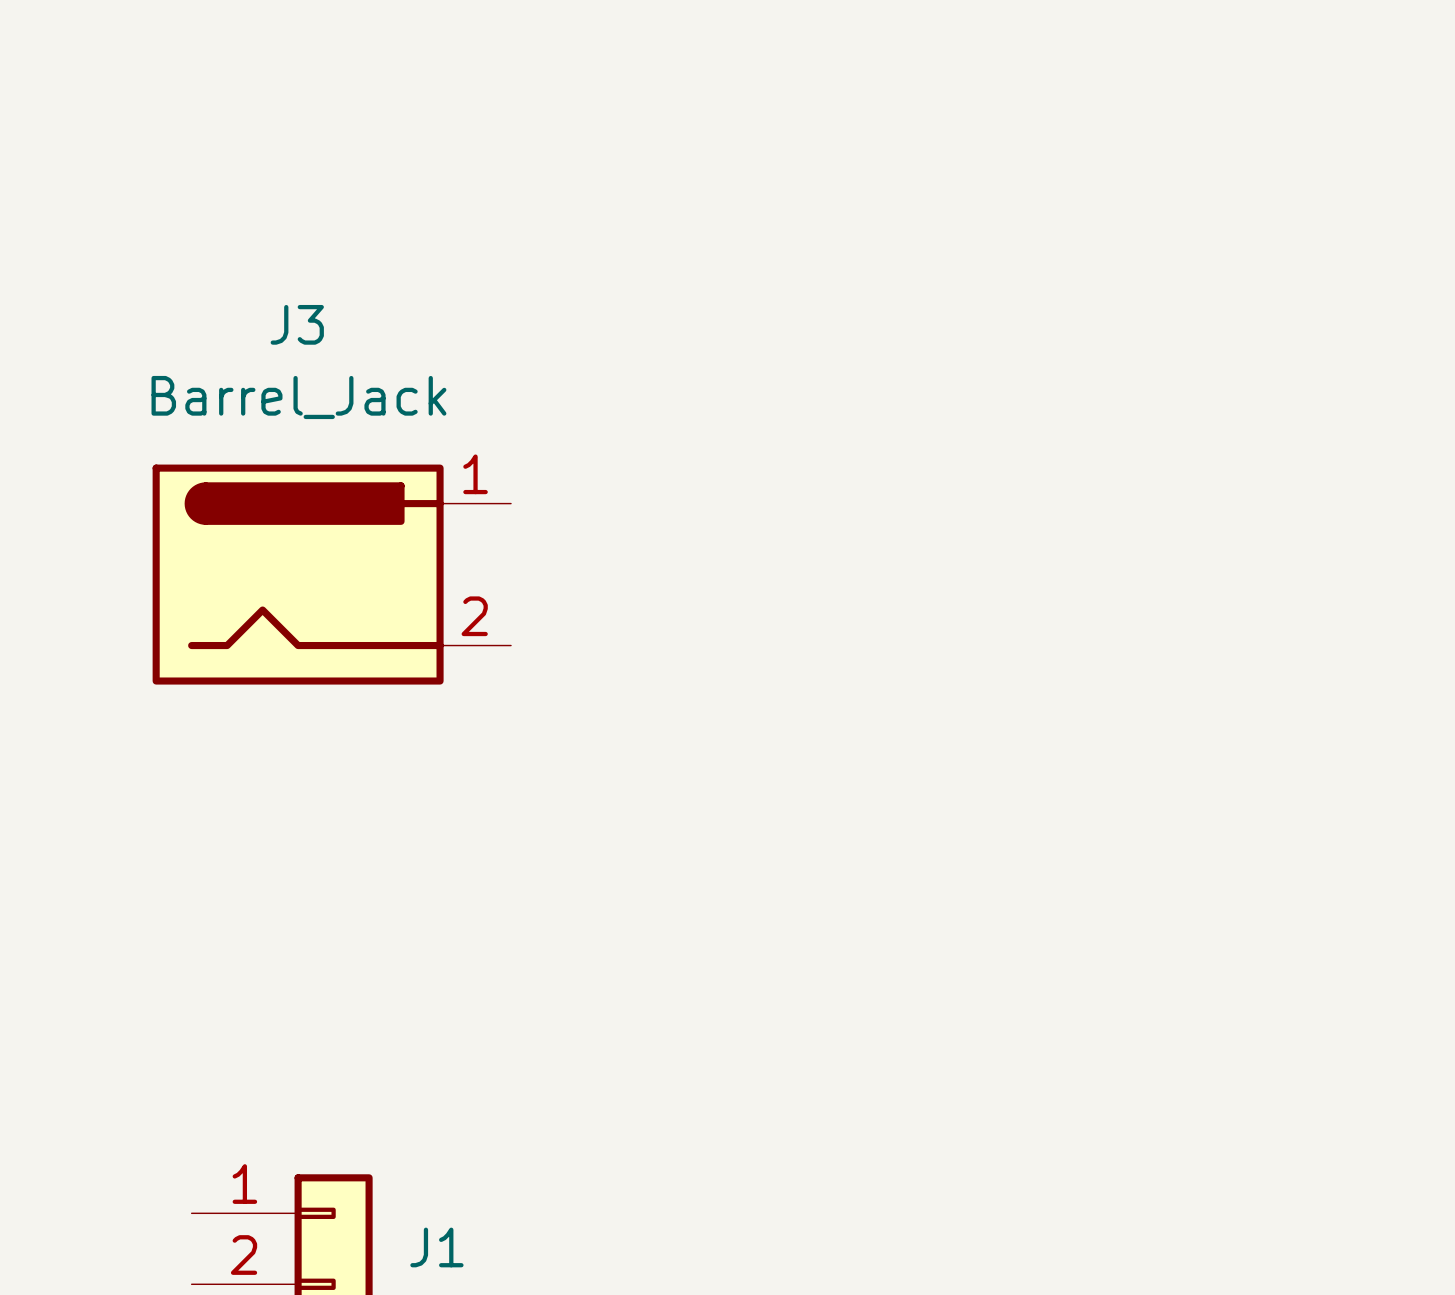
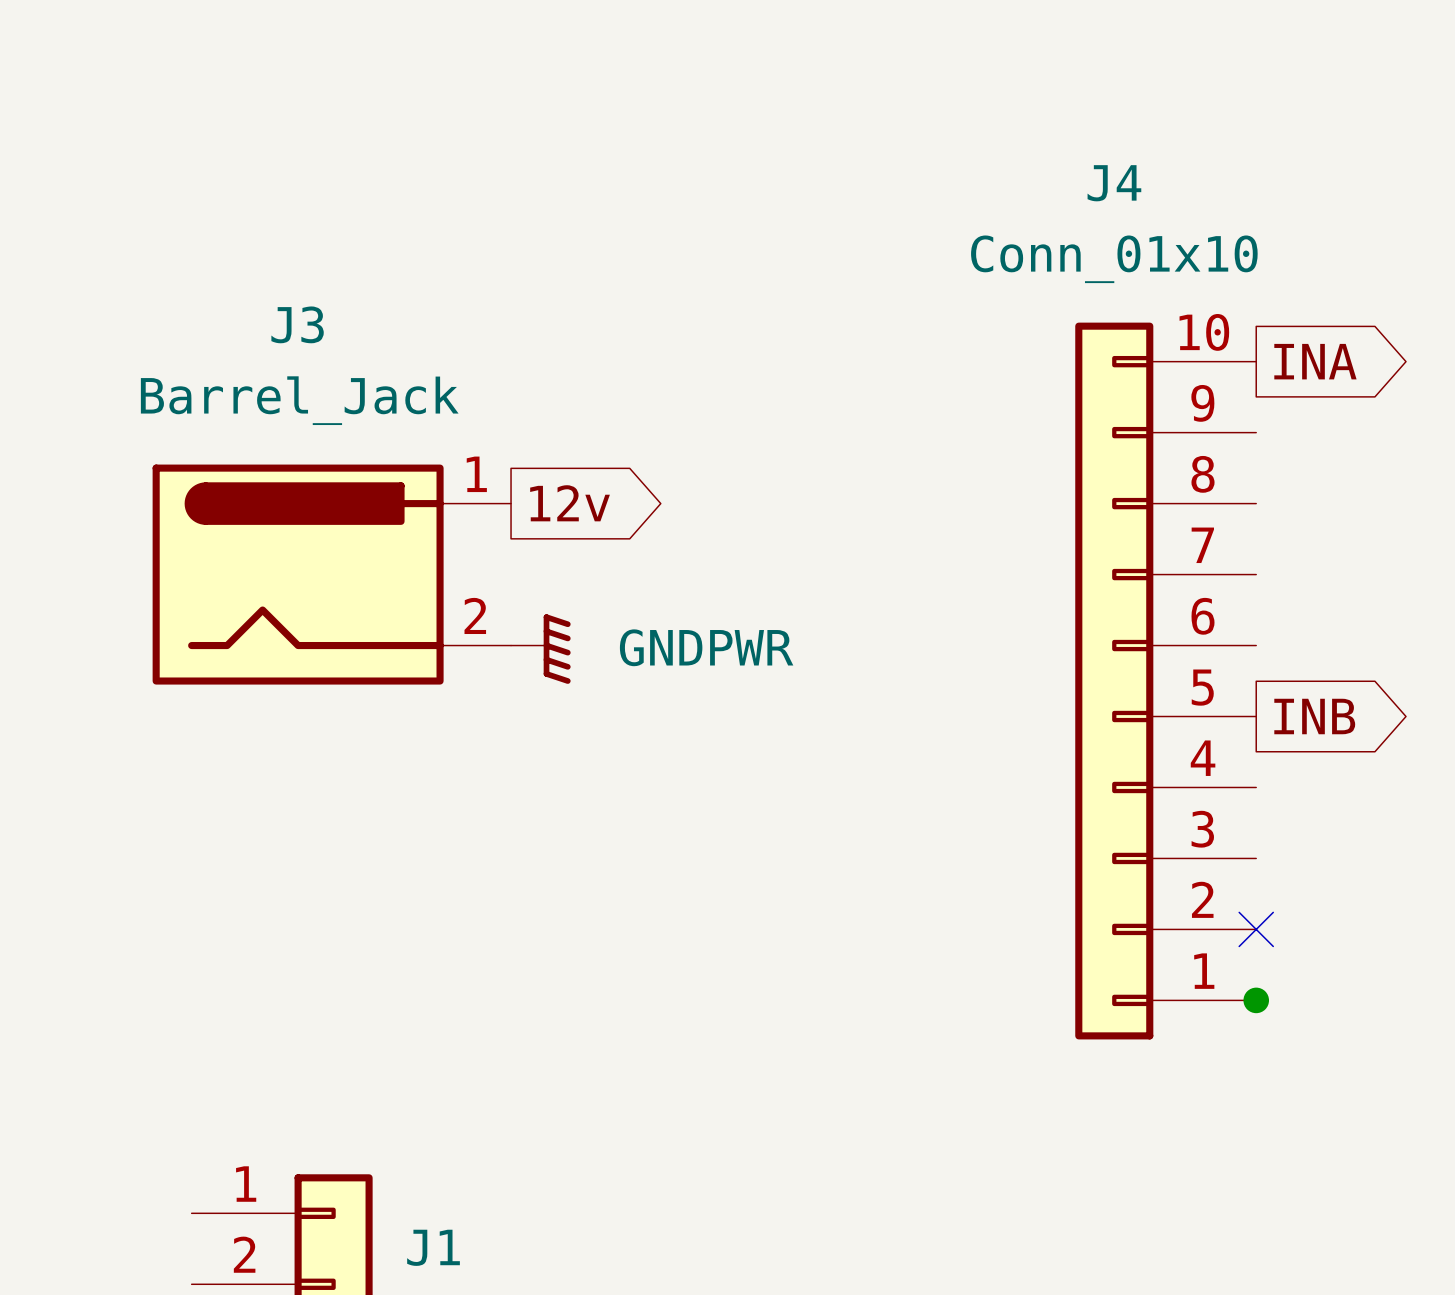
global label: none -> INA (1315, 361)
global label: none -> 12v (570, 503)
power symbol: none -> GNDPWR (540, 649)
J4: none -> Conn_01x10 (1165, 681)
global label: none -> INB (1314, 716)
no-connect mark: none -> (1256, 929)
junction: none -> (1256, 1000)

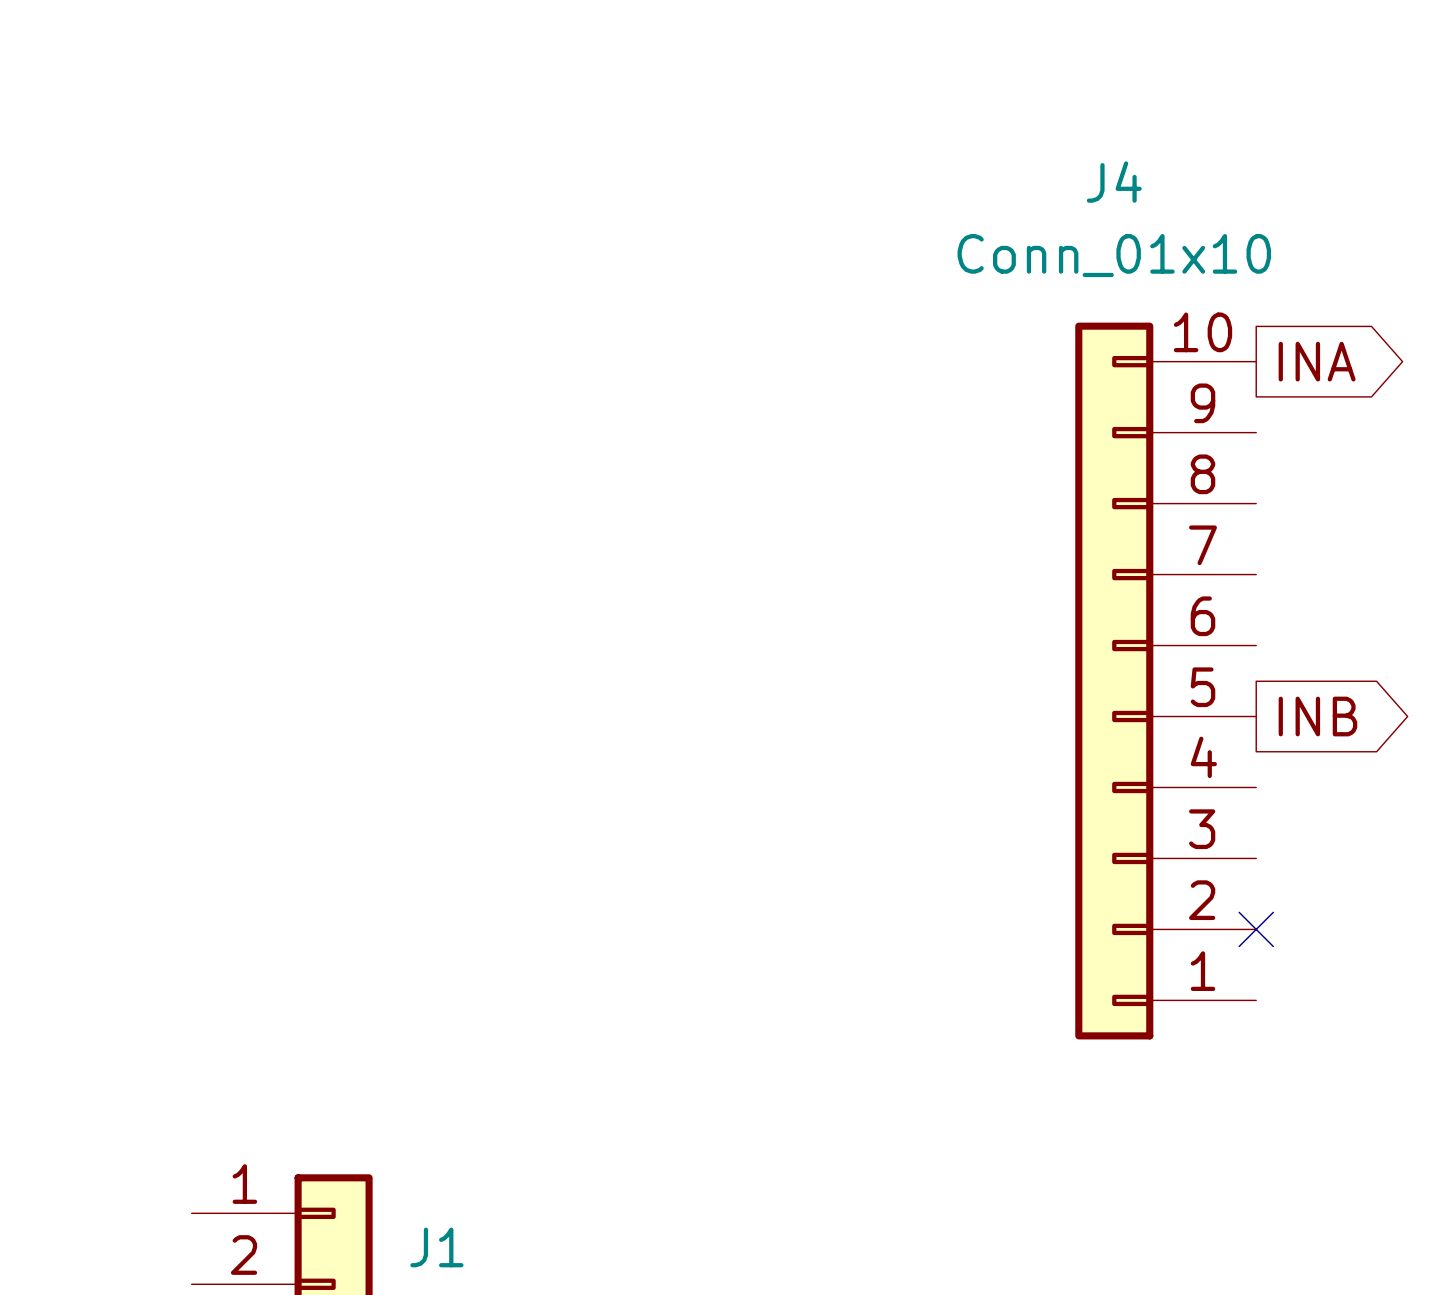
global label: 12v (570, 503) -> none
J3: Barrel_Jack (331, 574) -> none
power symbol: GNDPWR (540, 649) -> none
junction: (1256, 1000) -> none

